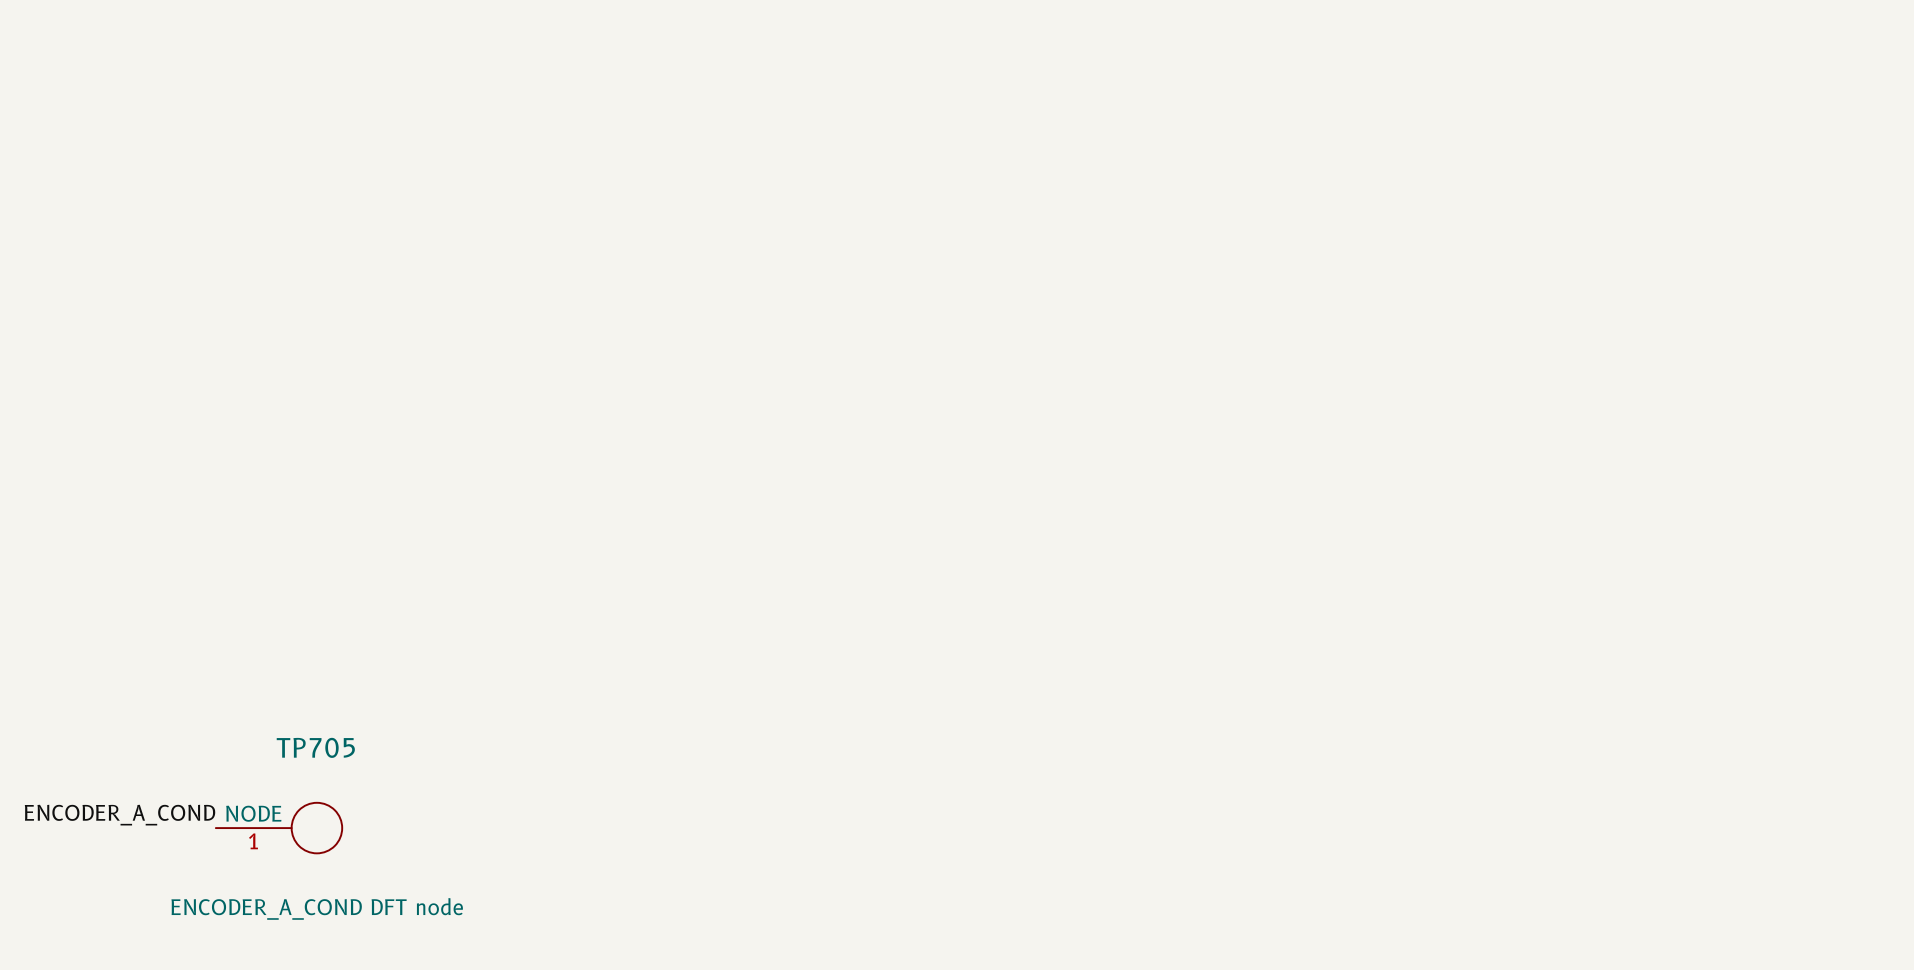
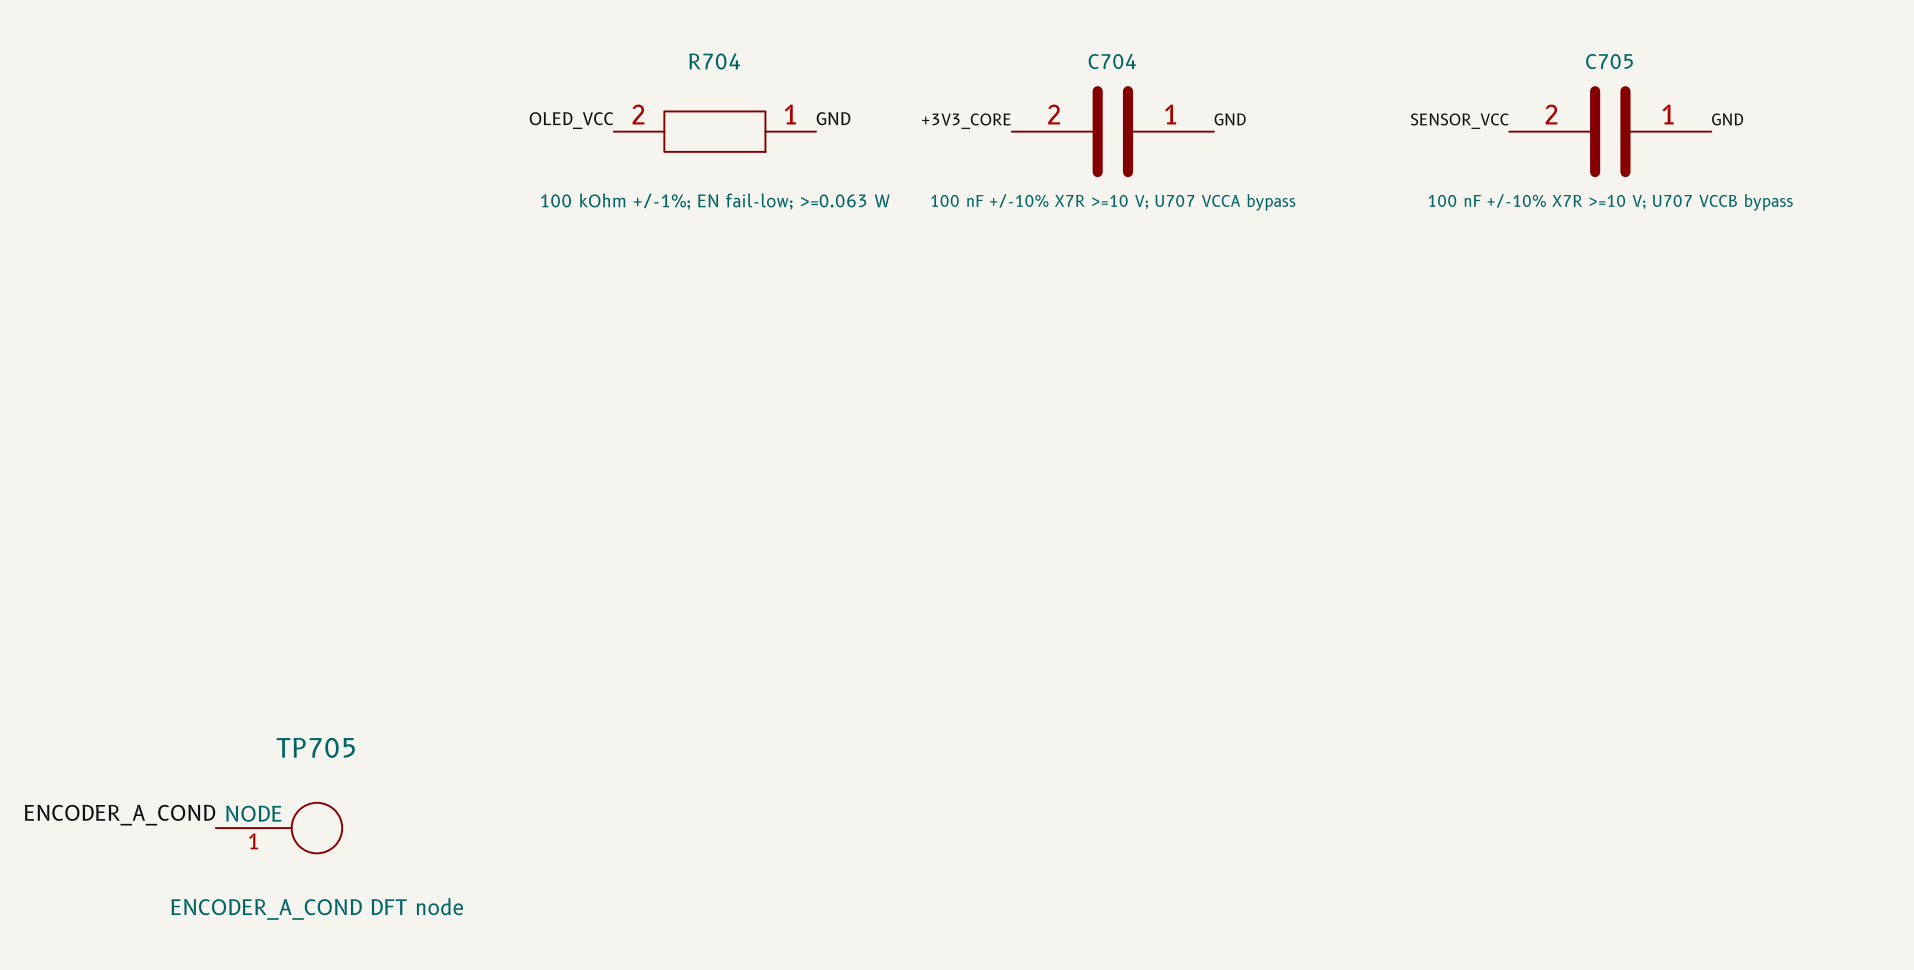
label: none -> GND (833, 118)
label: none -> GND (1230, 119)
label: none -> GND (1727, 119)
label: none -> OLED_VCC (571, 120)
label: none -> +3V3_CORE (966, 121)
label: none -> SENSOR_VCC (1459, 121)
R704: none -> 100 kOhm +/-1%; EN fail-low; >=0.063 W (714, 131)
C704: none -> 100 nF +/-10% X7R >=10 V; U707 VCCA bypass (1112, 131)
C705: none -> 100 nF +/-10% X7R >=10 V; U707 VCCB bypass (1610, 131)

